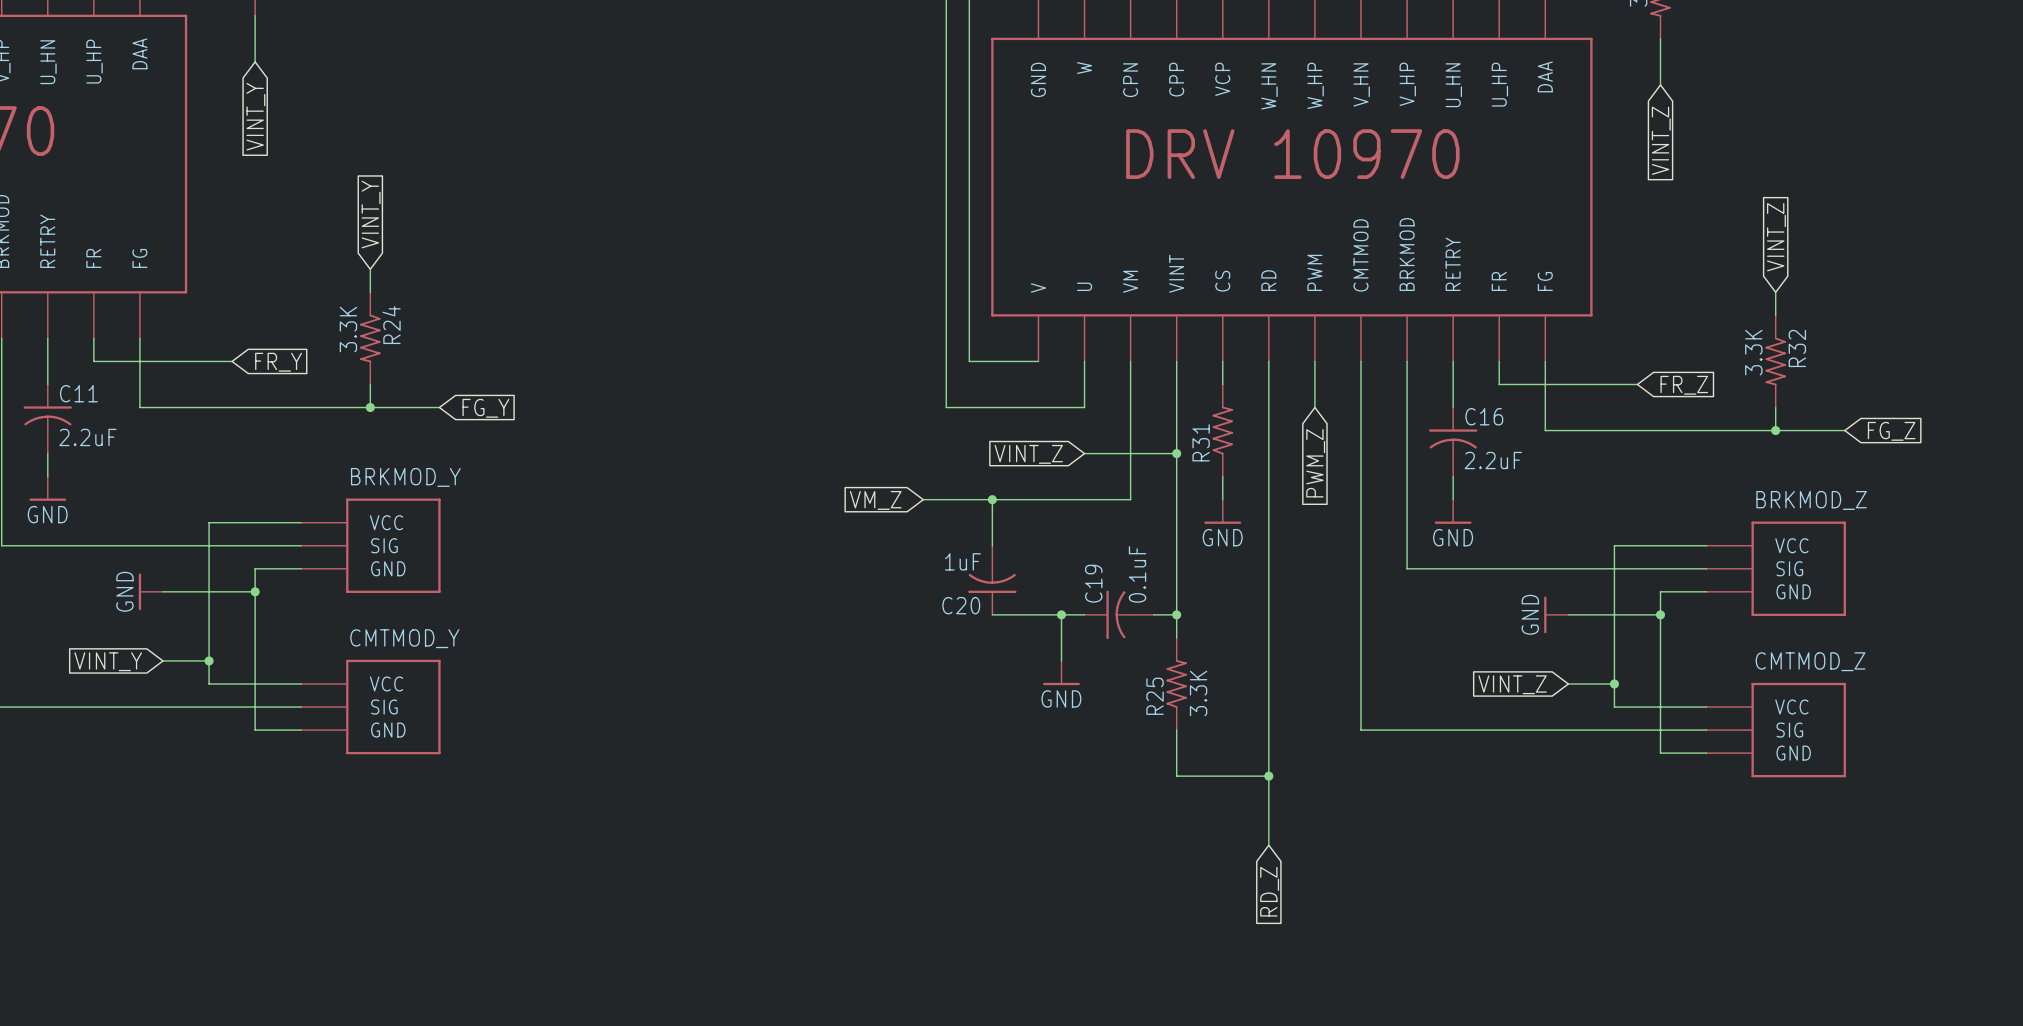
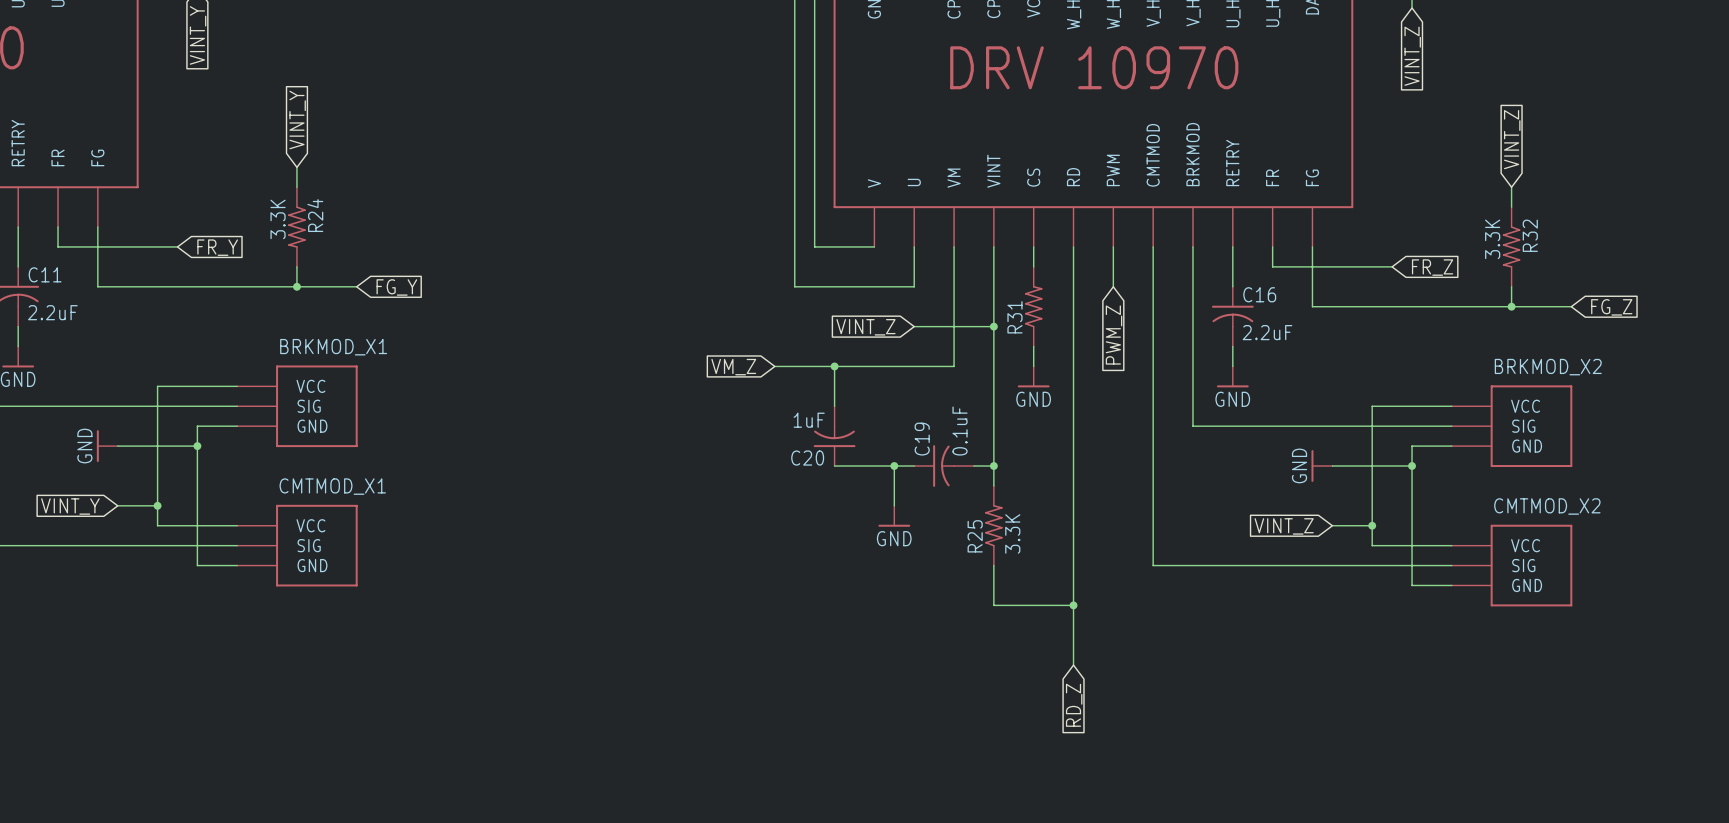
BRKMOD_Y name: BRKMOD_Y (405, 477) -> BRKMOD_X1 (333, 347)
BRKMOD_Z name: BRKMOD_Z (1811, 500) -> BRKMOD_X2 (1548, 367)
CMTMOD_Y name: CMTMOD_Y (404, 638) -> CMTMOD_X1 (332, 486)
CMTMOD_Z name: CMTMOD_Z (1810, 661) -> CMTMOD_X2 (1547, 506)

